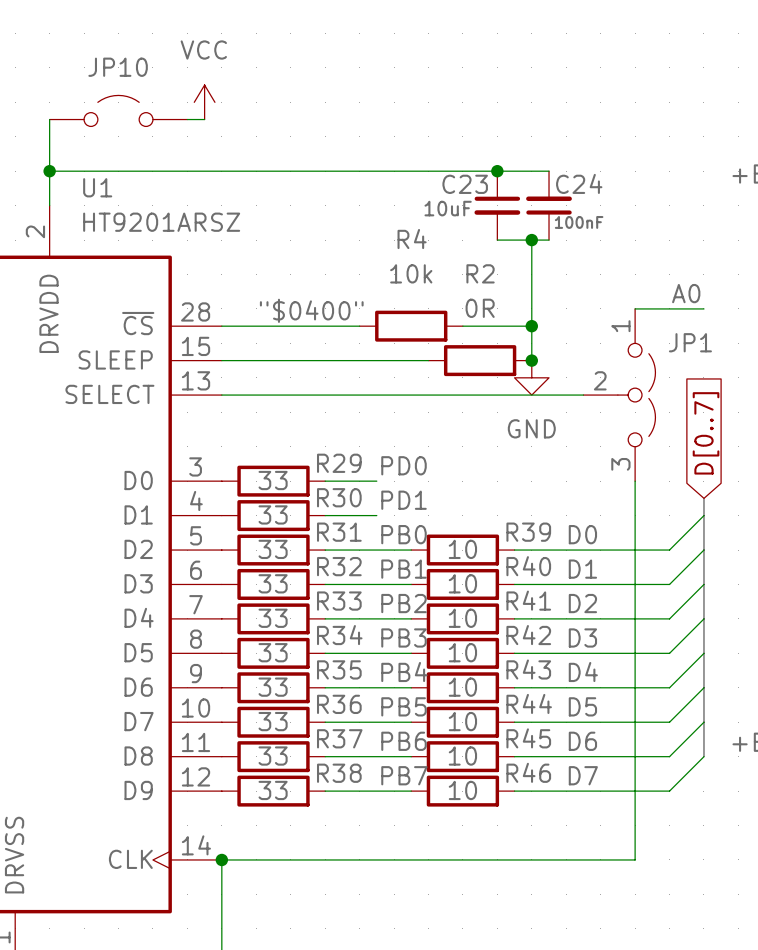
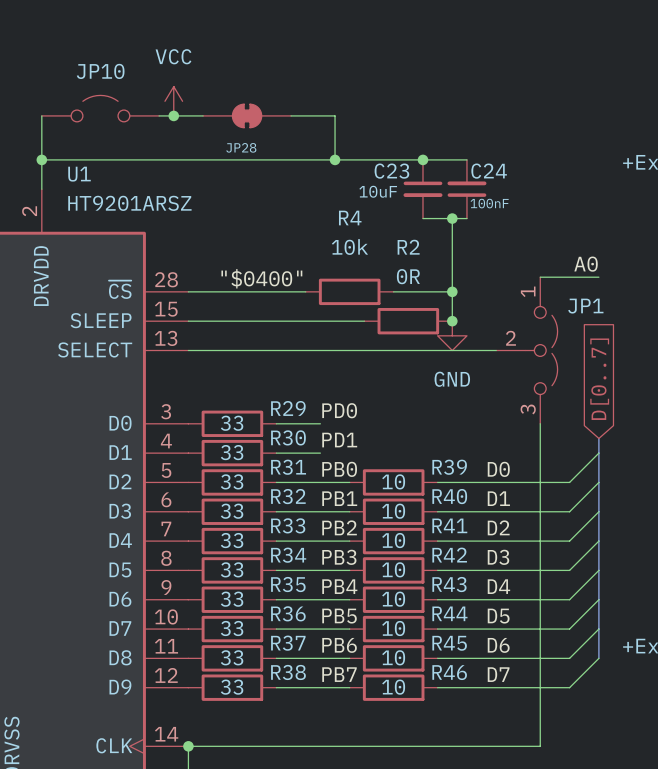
wire: none -> (173, 115) (203, 115)
junction: none -> (173, 115)
JP28: none -> (247, 115)
wire: none -> (291, 115) (335, 115) (335, 159)
junction: none -> (335, 159)

